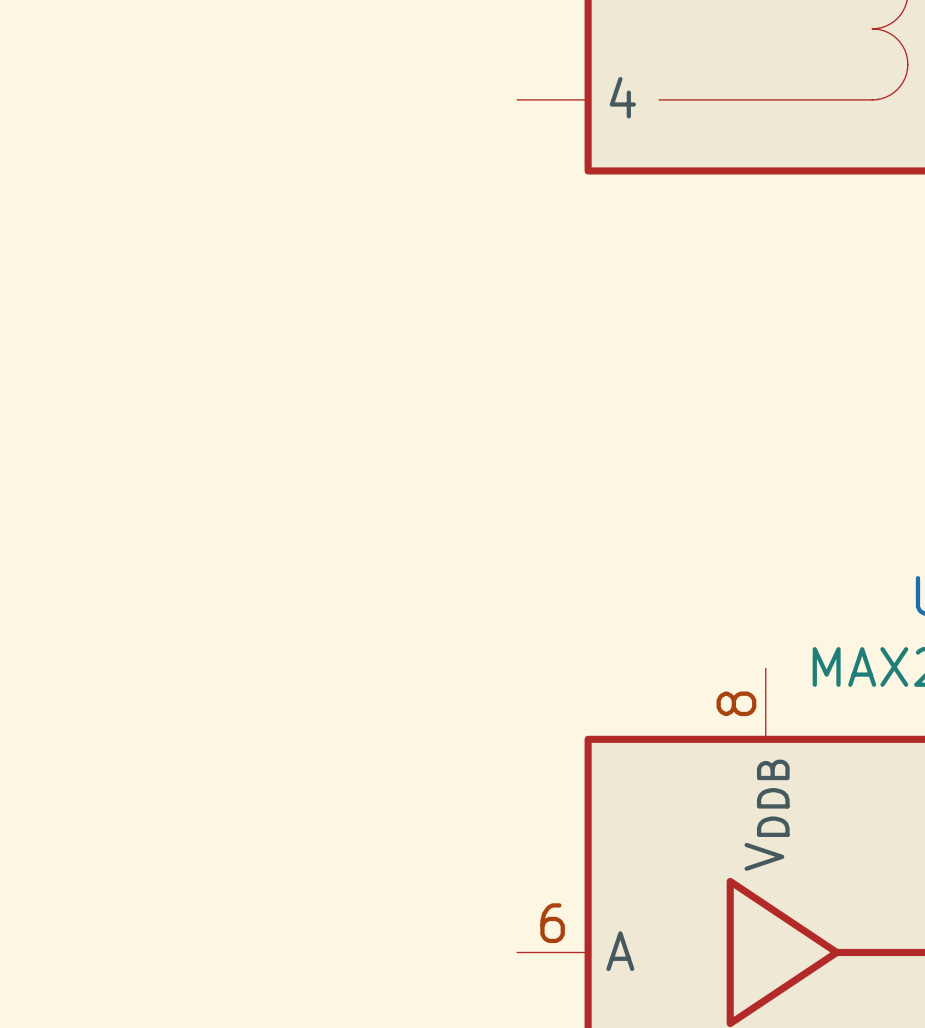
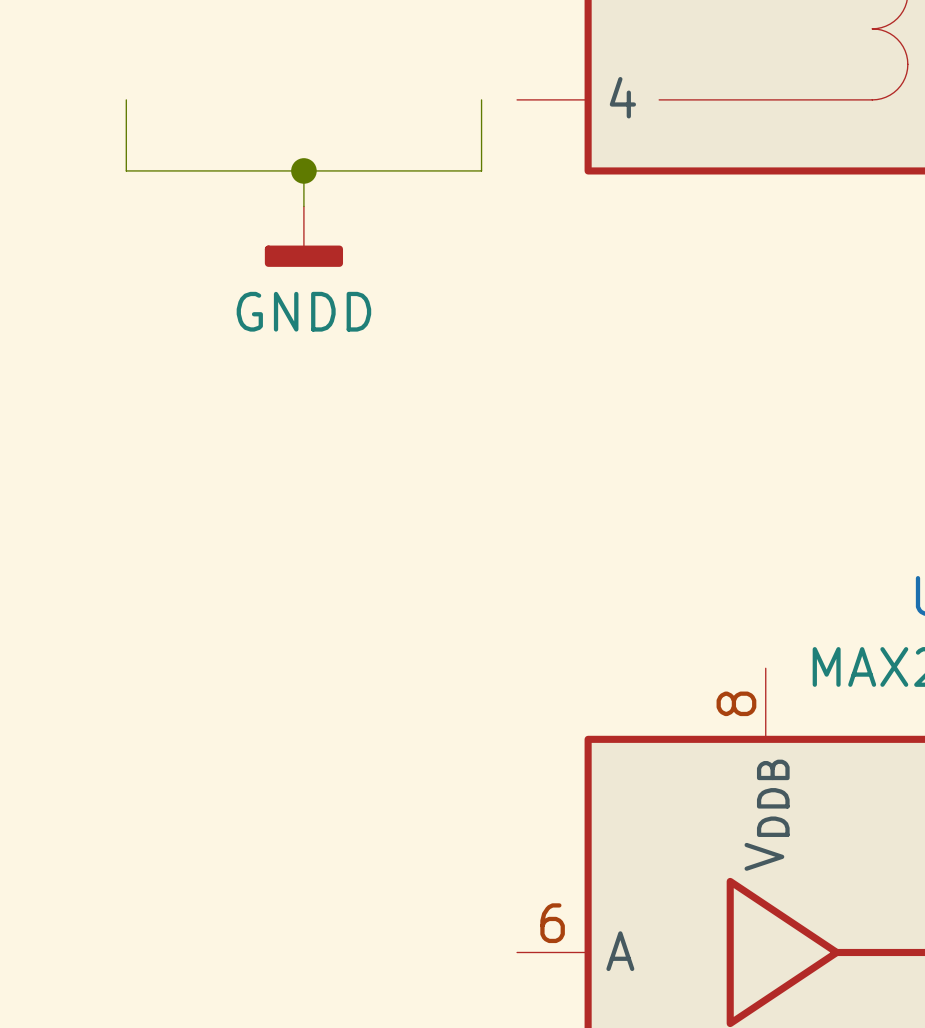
wire: none -> (126, 99) (126, 170) (481, 170) (481, 99)
wire: none -> (303, 170) (303, 206)
junction: none -> (303, 170)
power symbol: none -> GNDD (303, 236)

